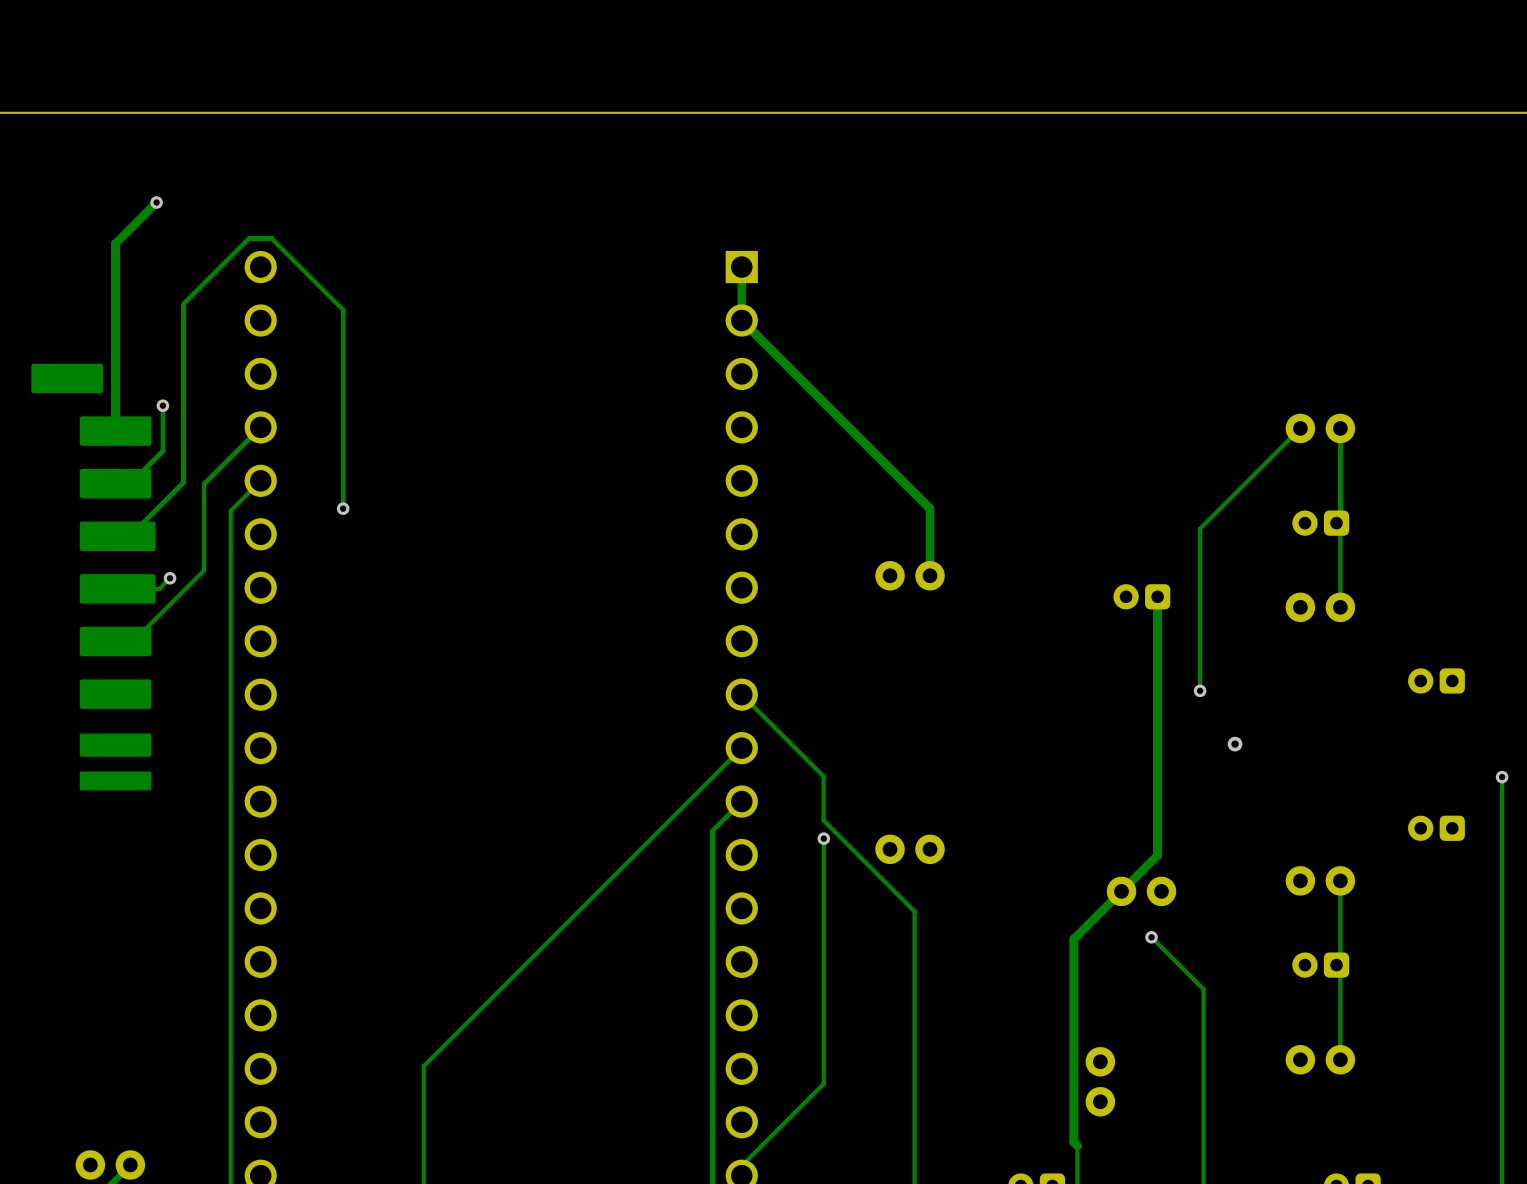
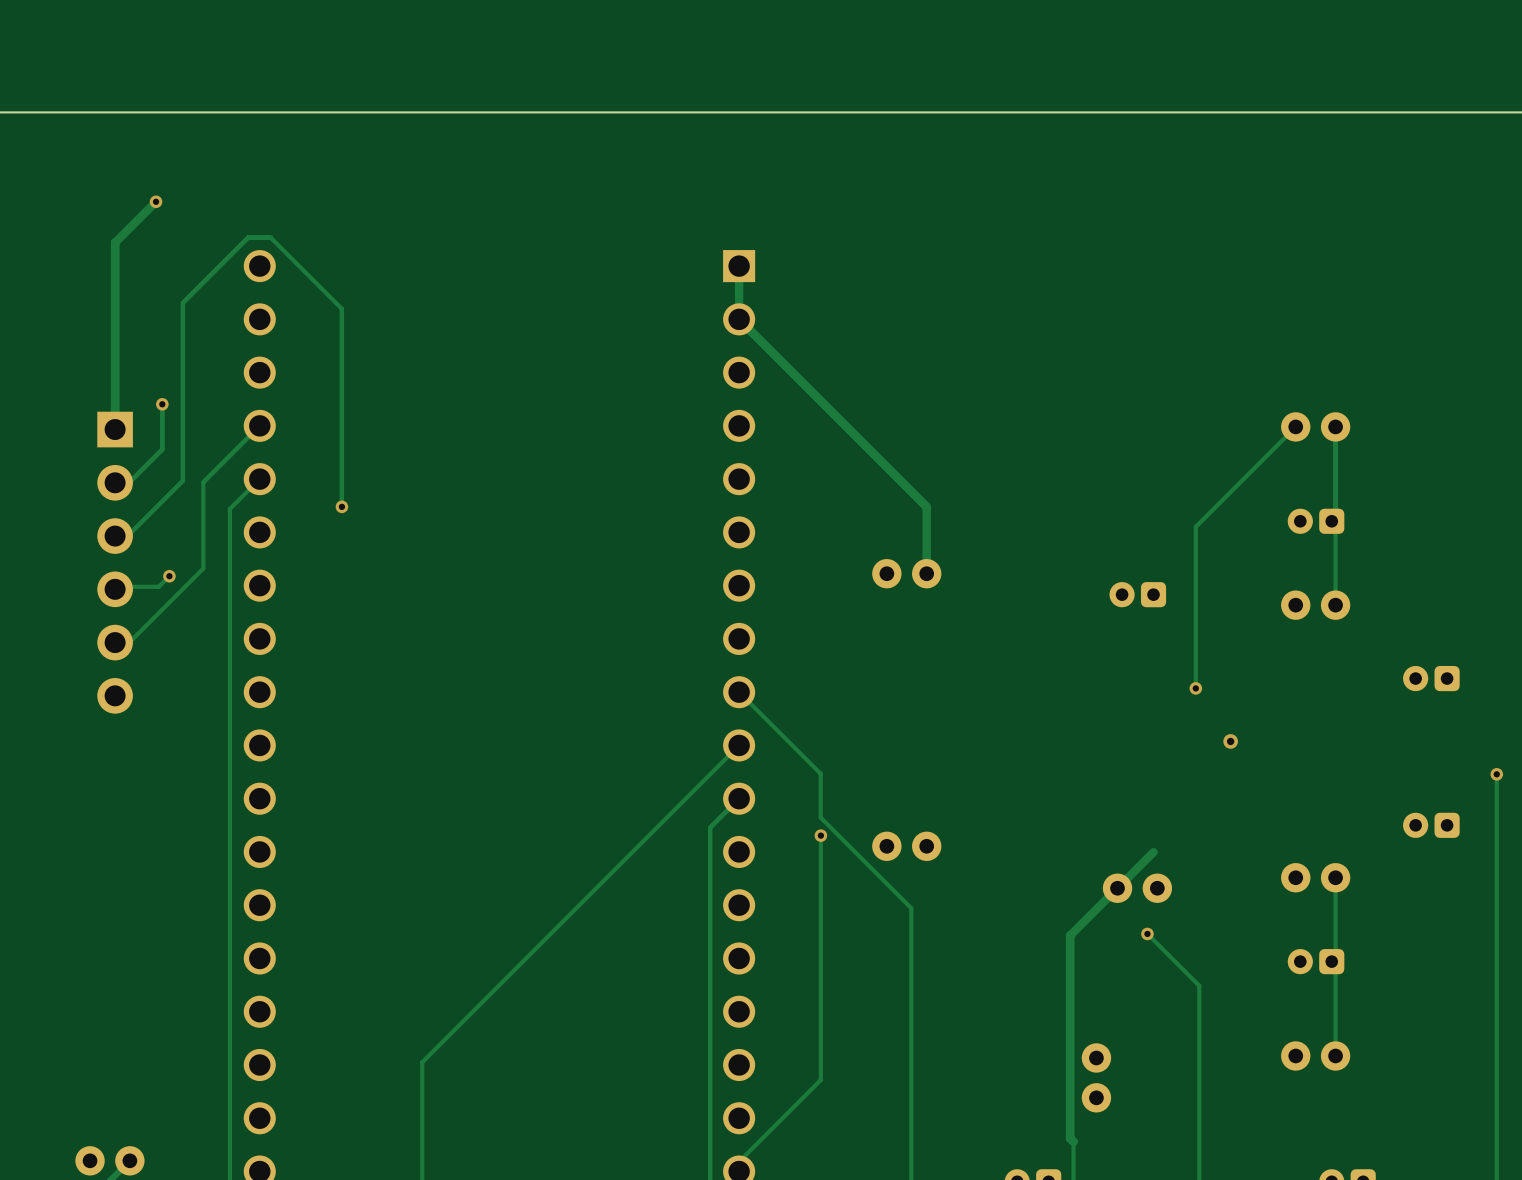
part: none -> (115, 562)
part: (93, 577) -> none
track: (1157, 596) (1157, 855) -> none

